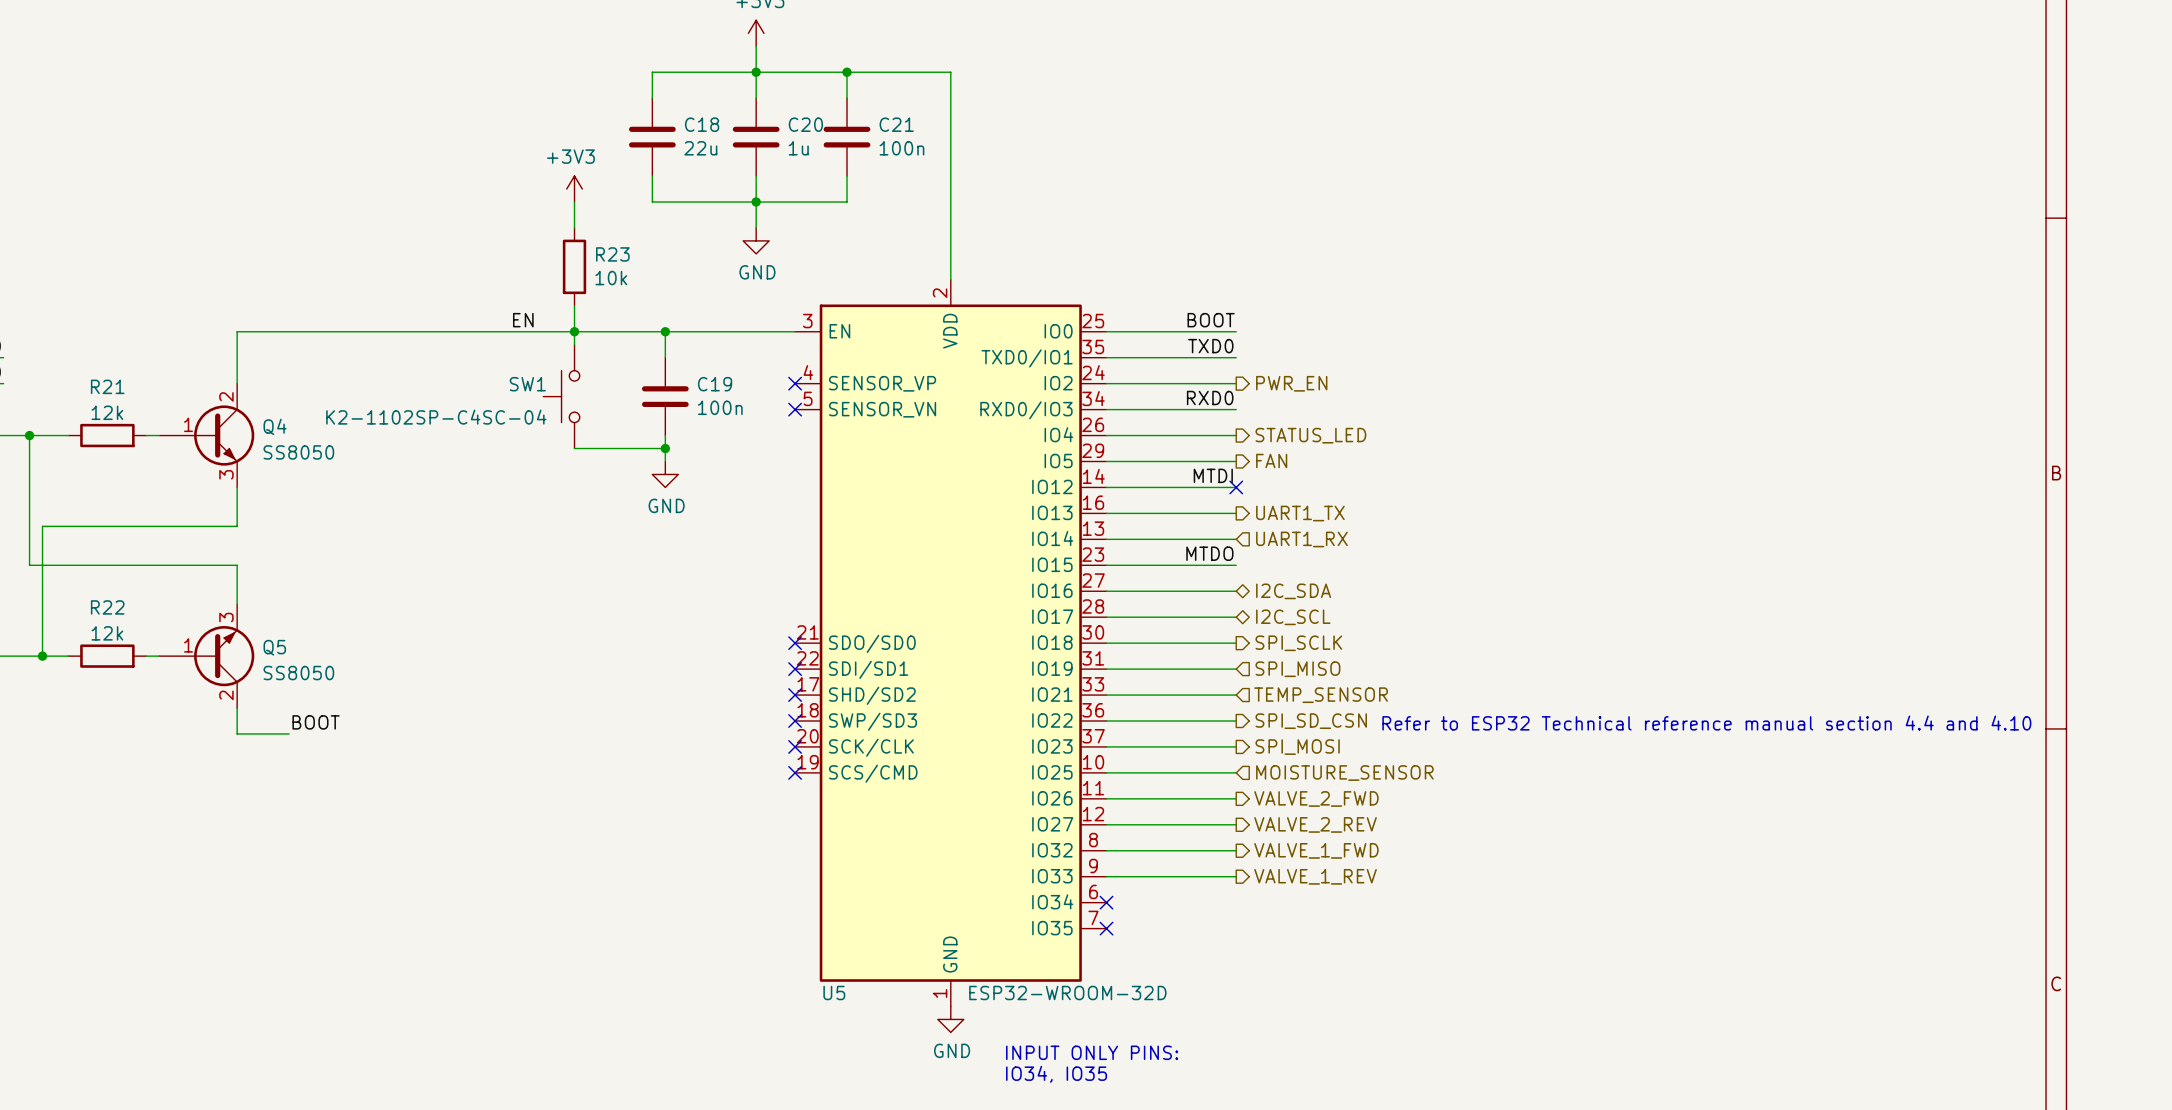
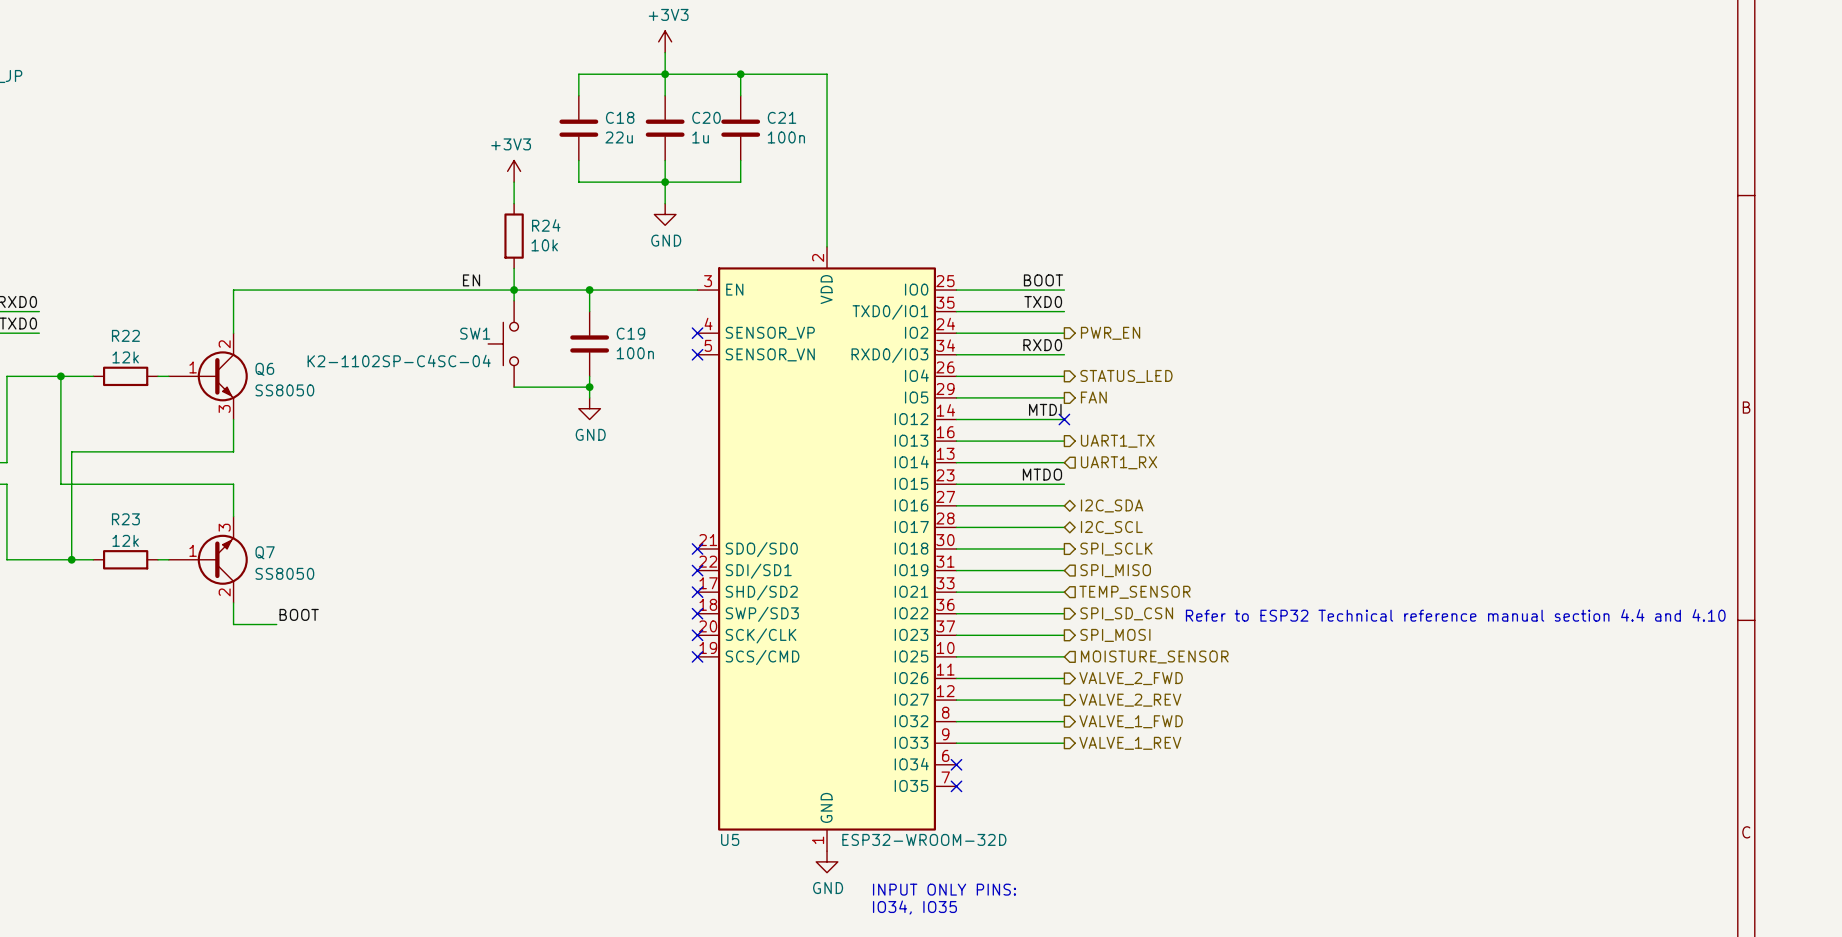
R23 name: R23 (612, 254) -> R24 (546, 225)
R21 name: R21 (107, 386) -> R22 (125, 335)
Q4 name: Q4 (275, 426) -> Q6 (264, 369)
R22 name: R22 (107, 607) -> R23 (125, 519)
Q5 name: Q5 (274, 647) -> Q7 (265, 552)

